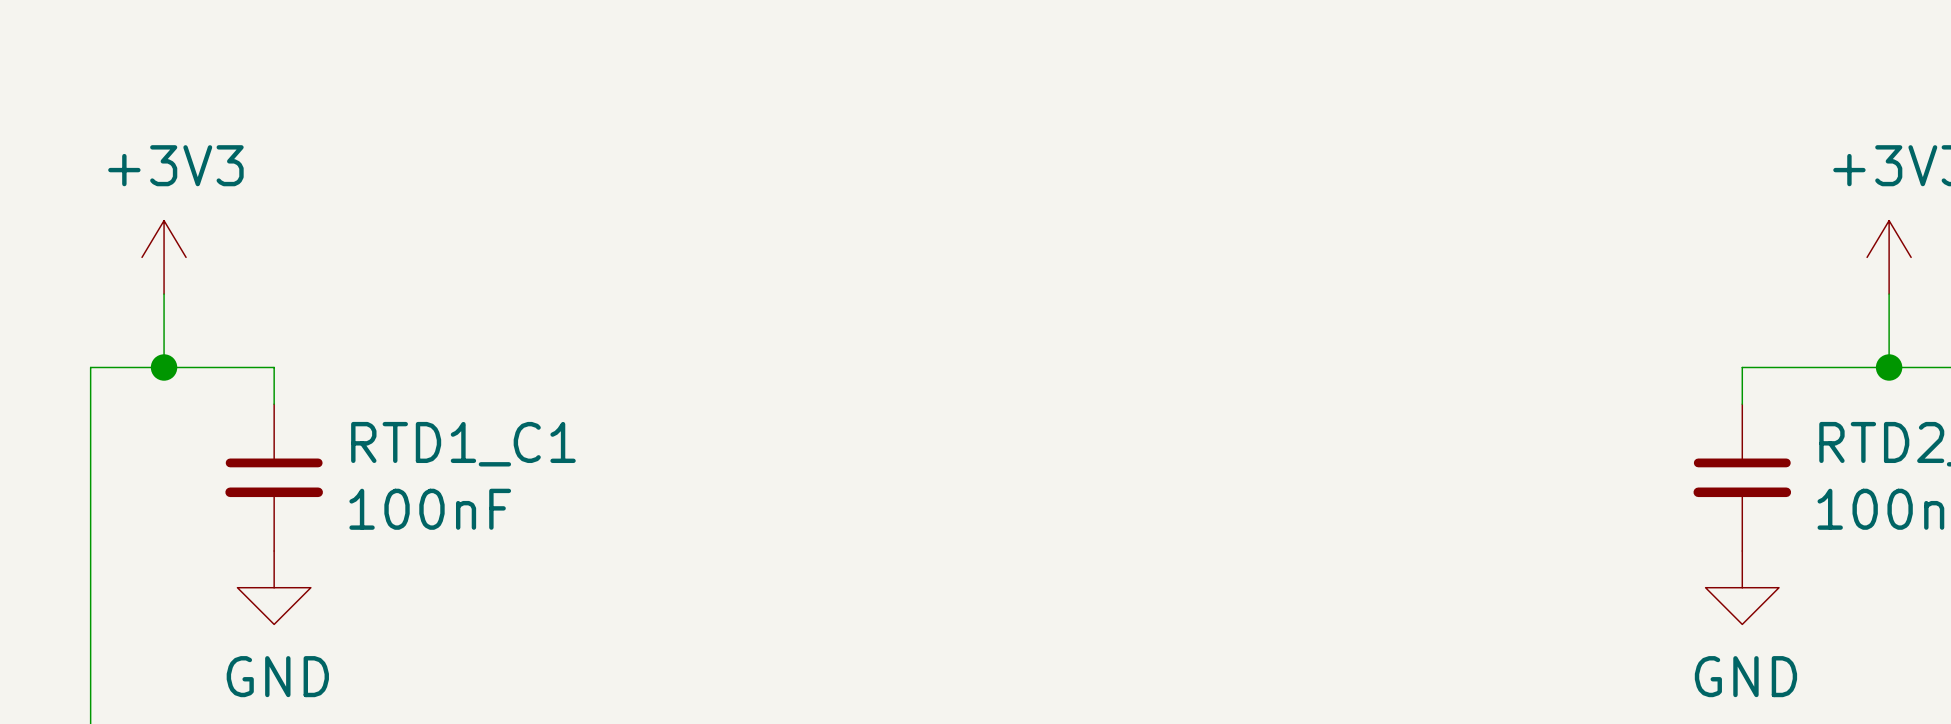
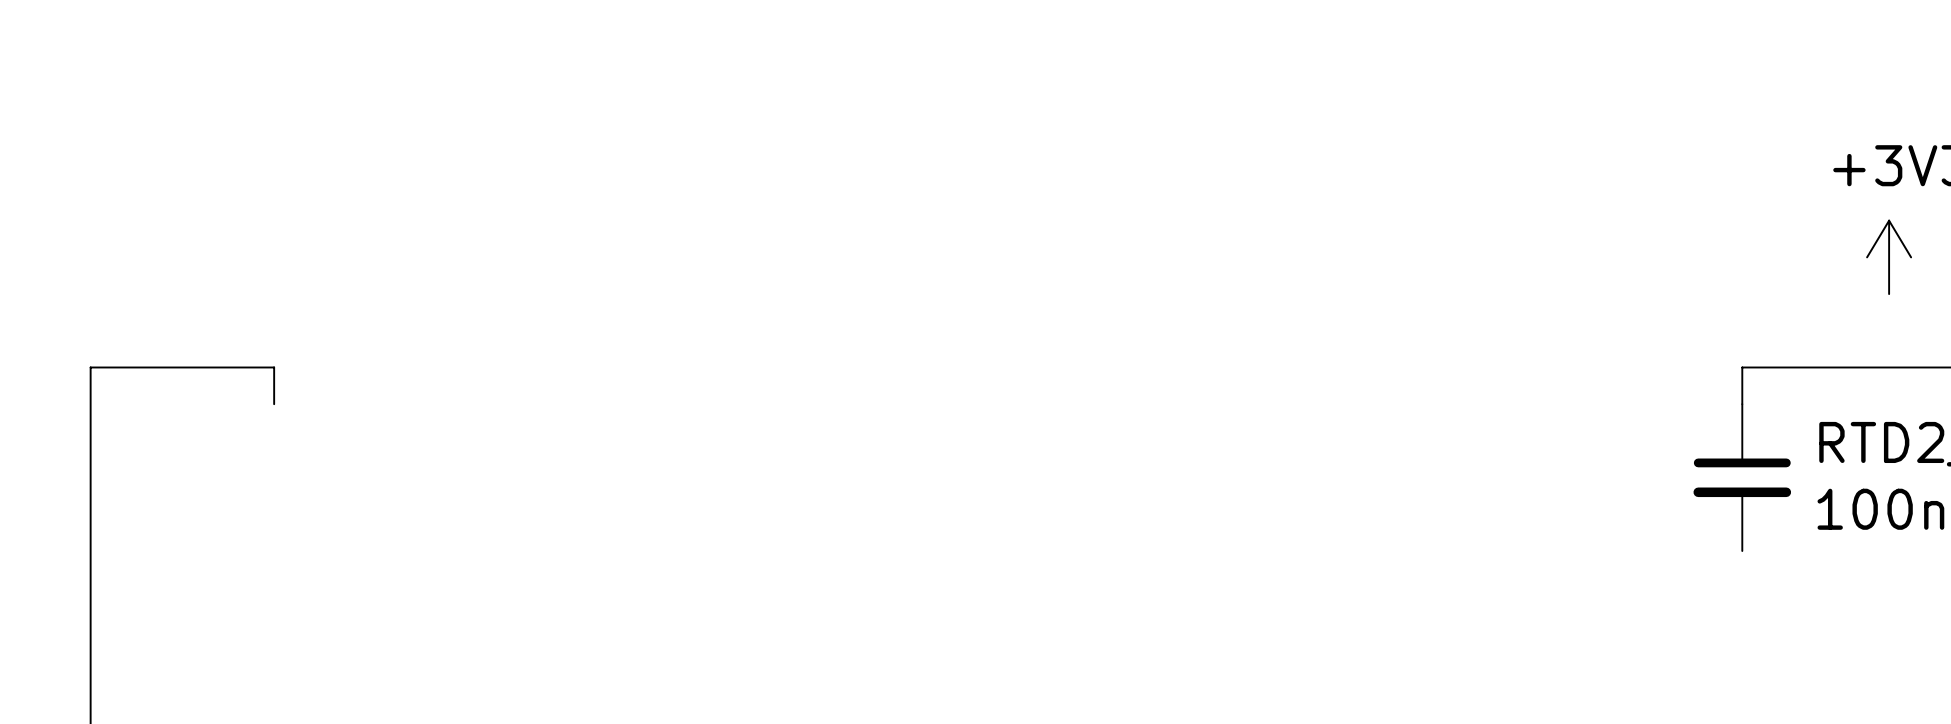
power symbol: +3V3 (164, 257) -> none
wire: (164, 294) (164, 367) -> none
wire: (1889, 294) (1889, 367) -> none
junction: (164, 367) -> none
junction: (1889, 367) -> none
RTD1_C1: 100nF (274, 477) -> none
power symbol: GND (274, 587) -> none
power symbol: GND (1742, 587) -> none

